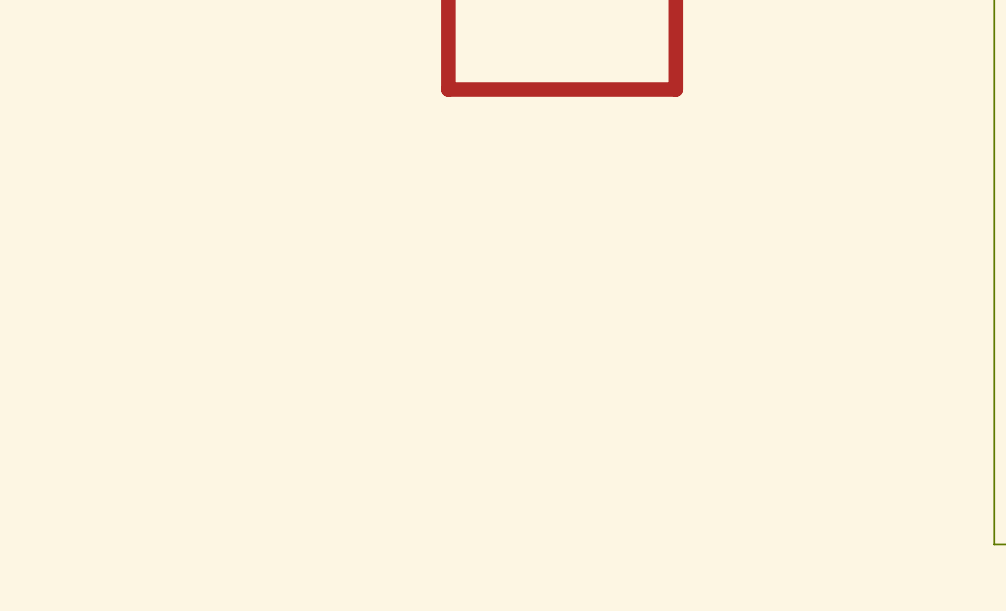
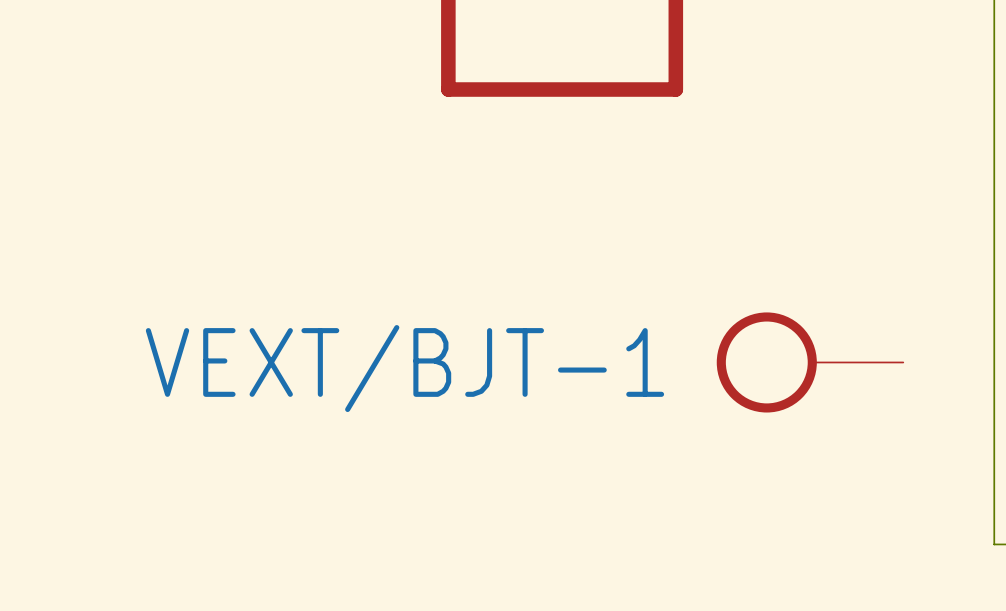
VEXT/BJT-1: none -> (810, 362)

